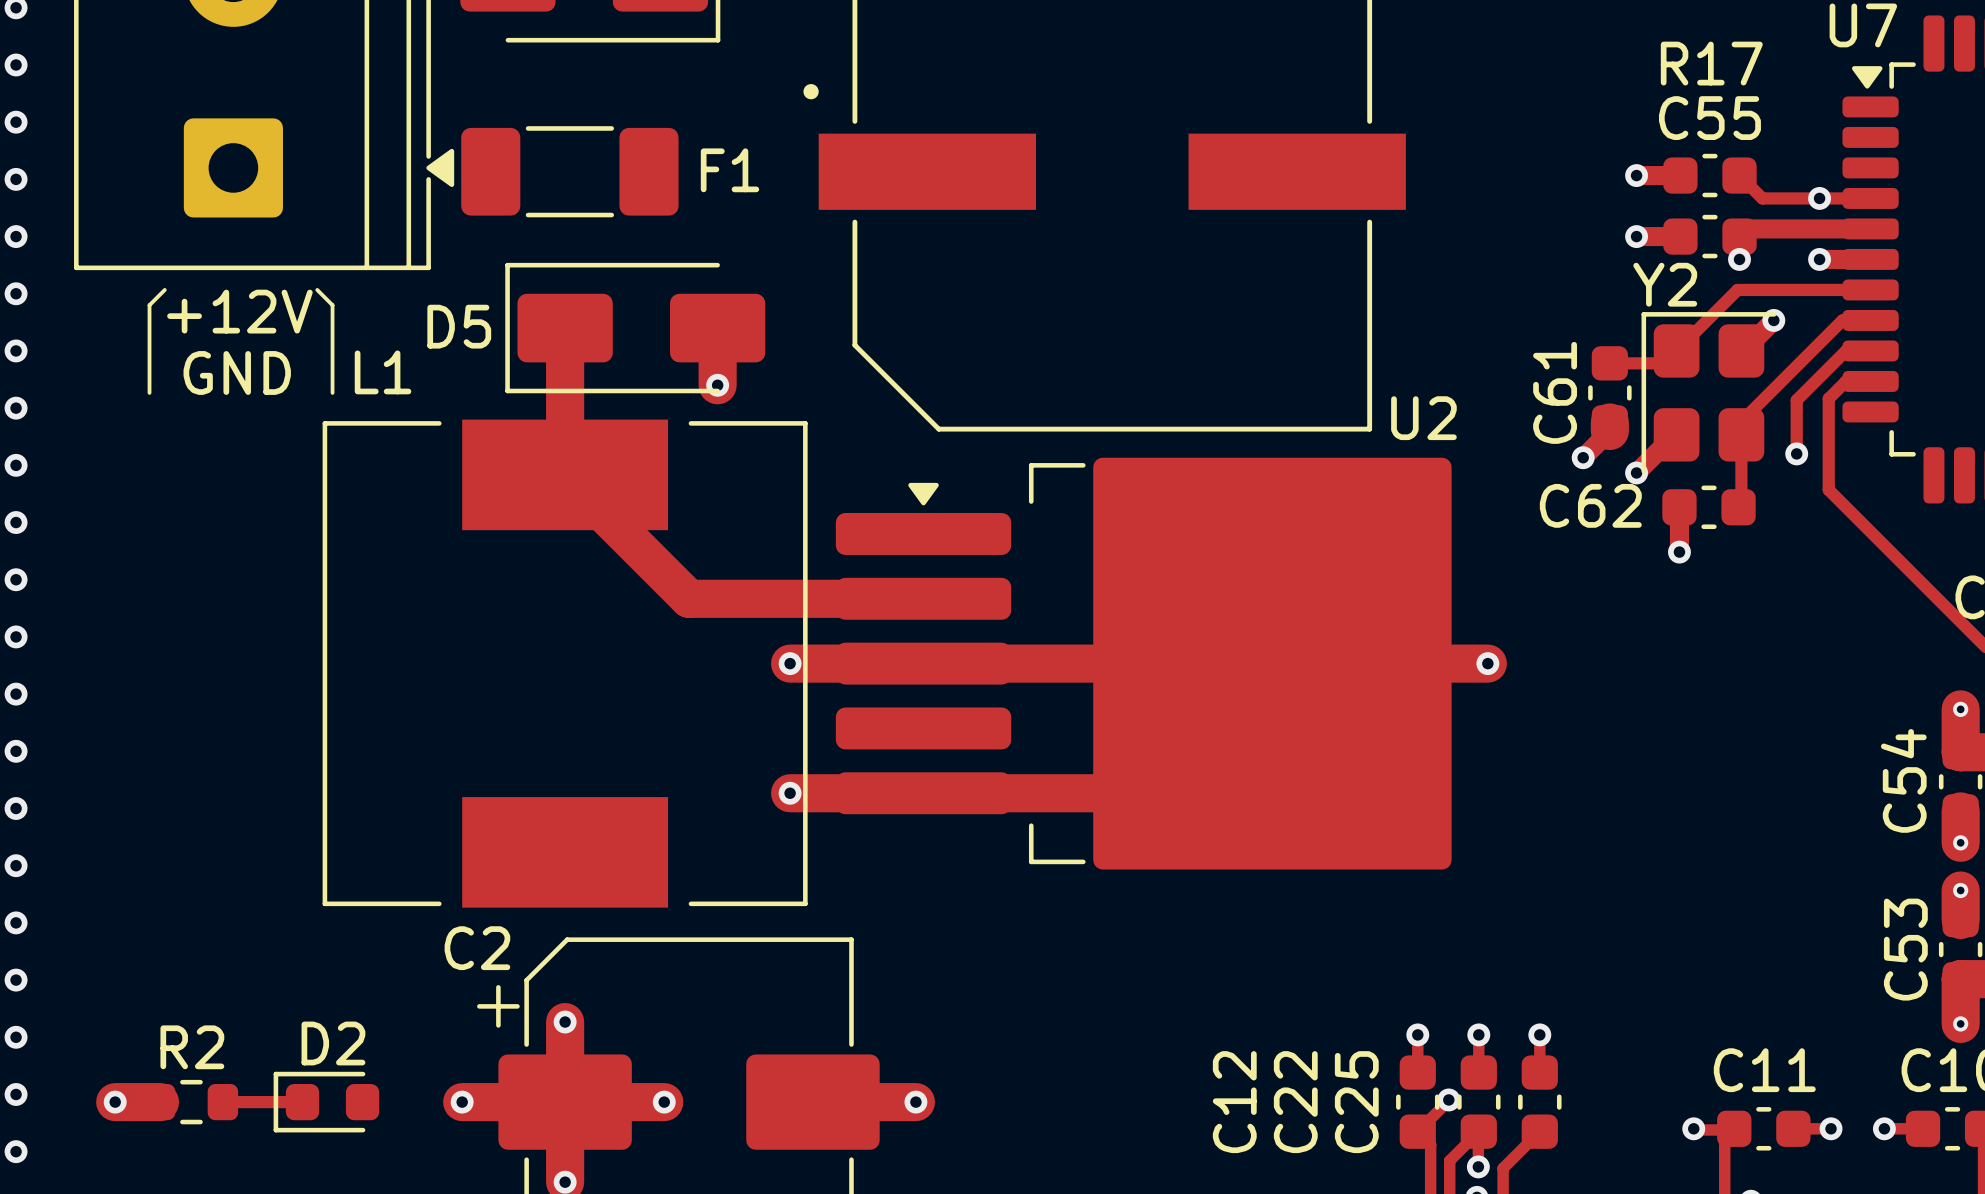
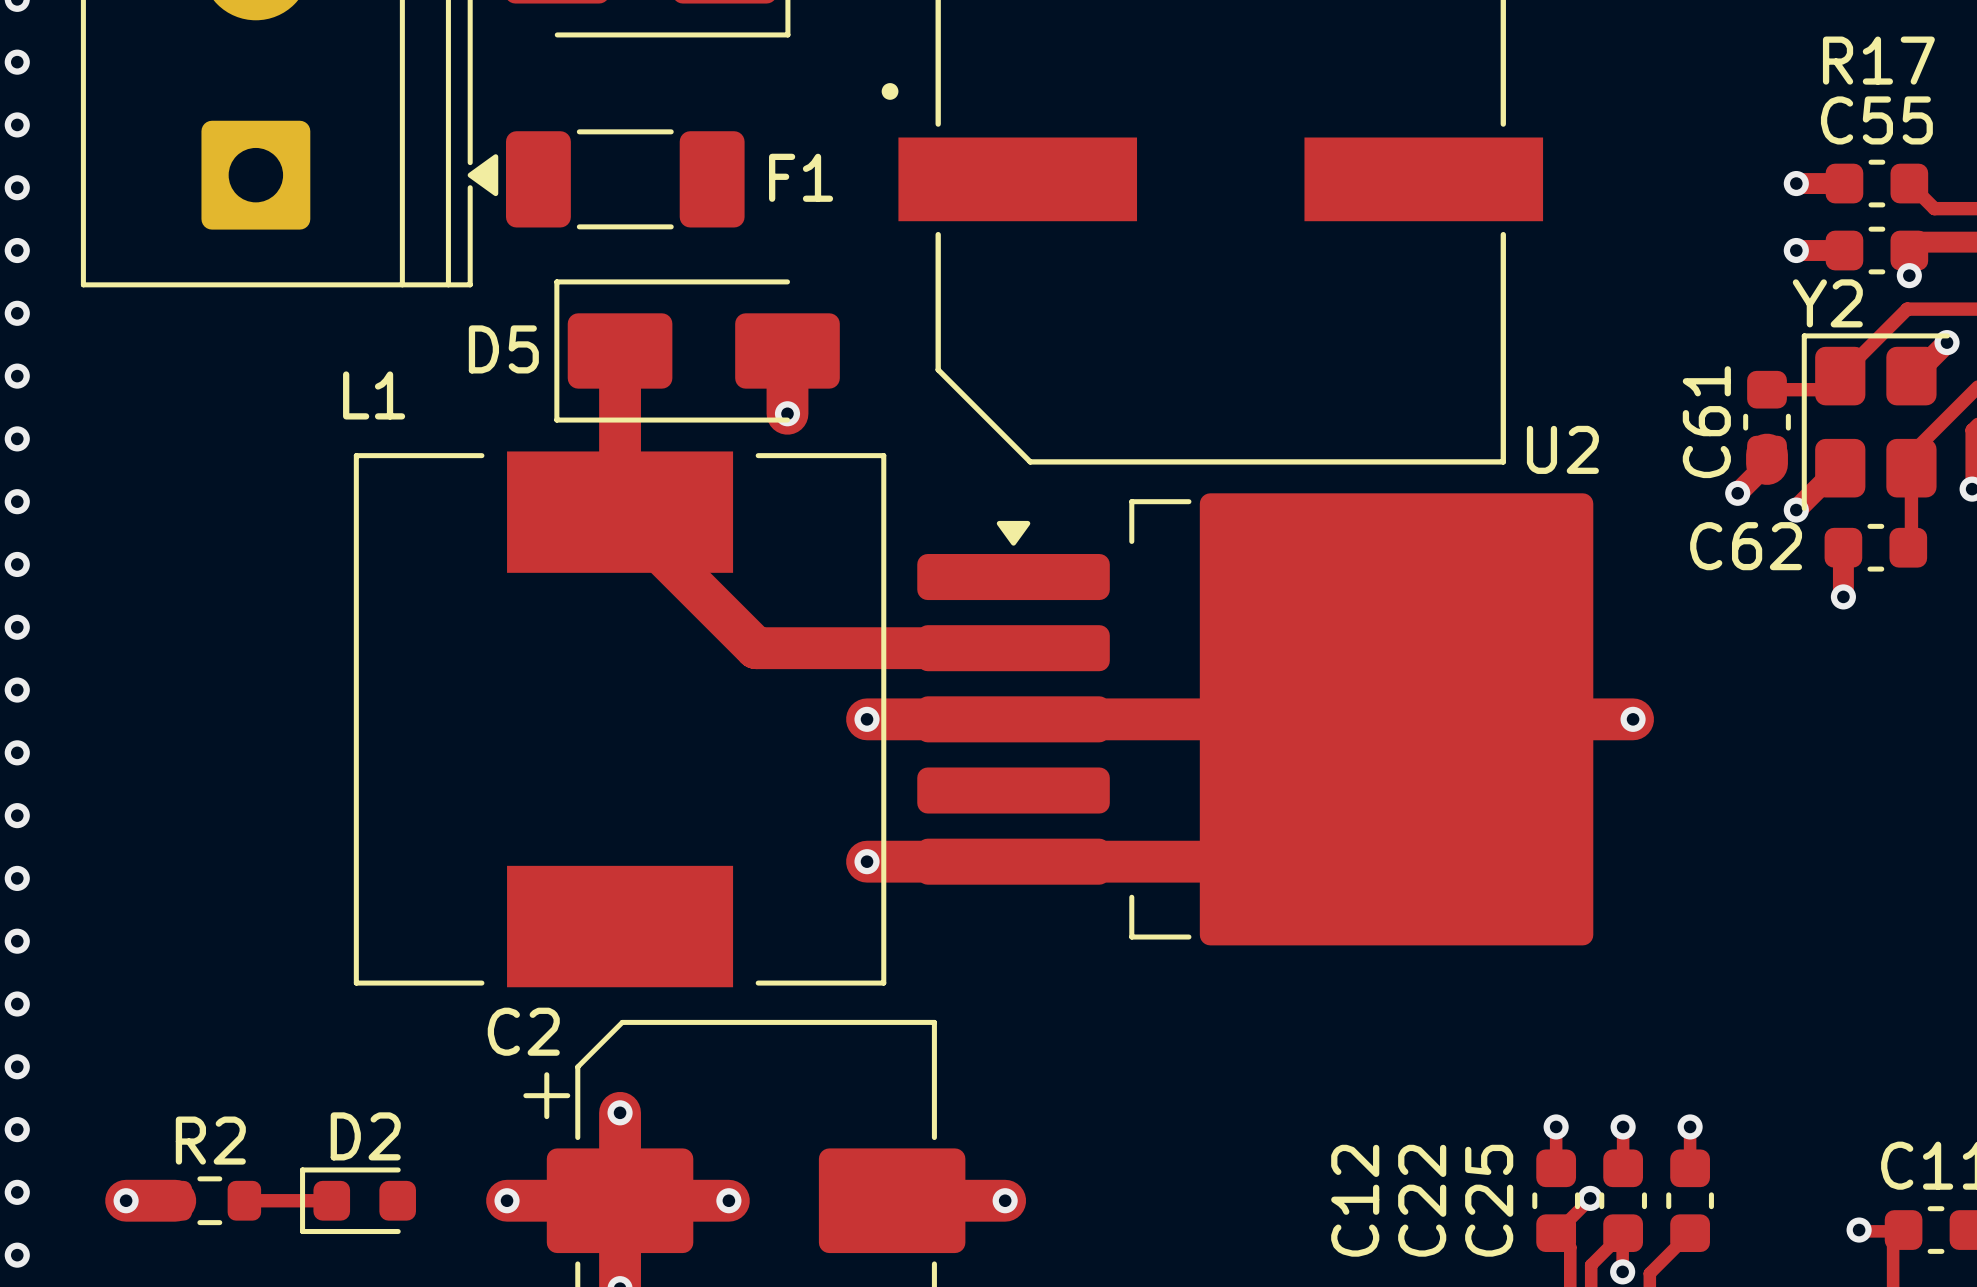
line: (164, 289) (149, 305) (149, 392) -> none
line: (317, 289) (332, 305) (332, 392) -> none
text: +12V (239, 311) -> none
text: GND (237, 372) -> none
L1 name position: L1 (383, 372) -> L1 (374, 395)

